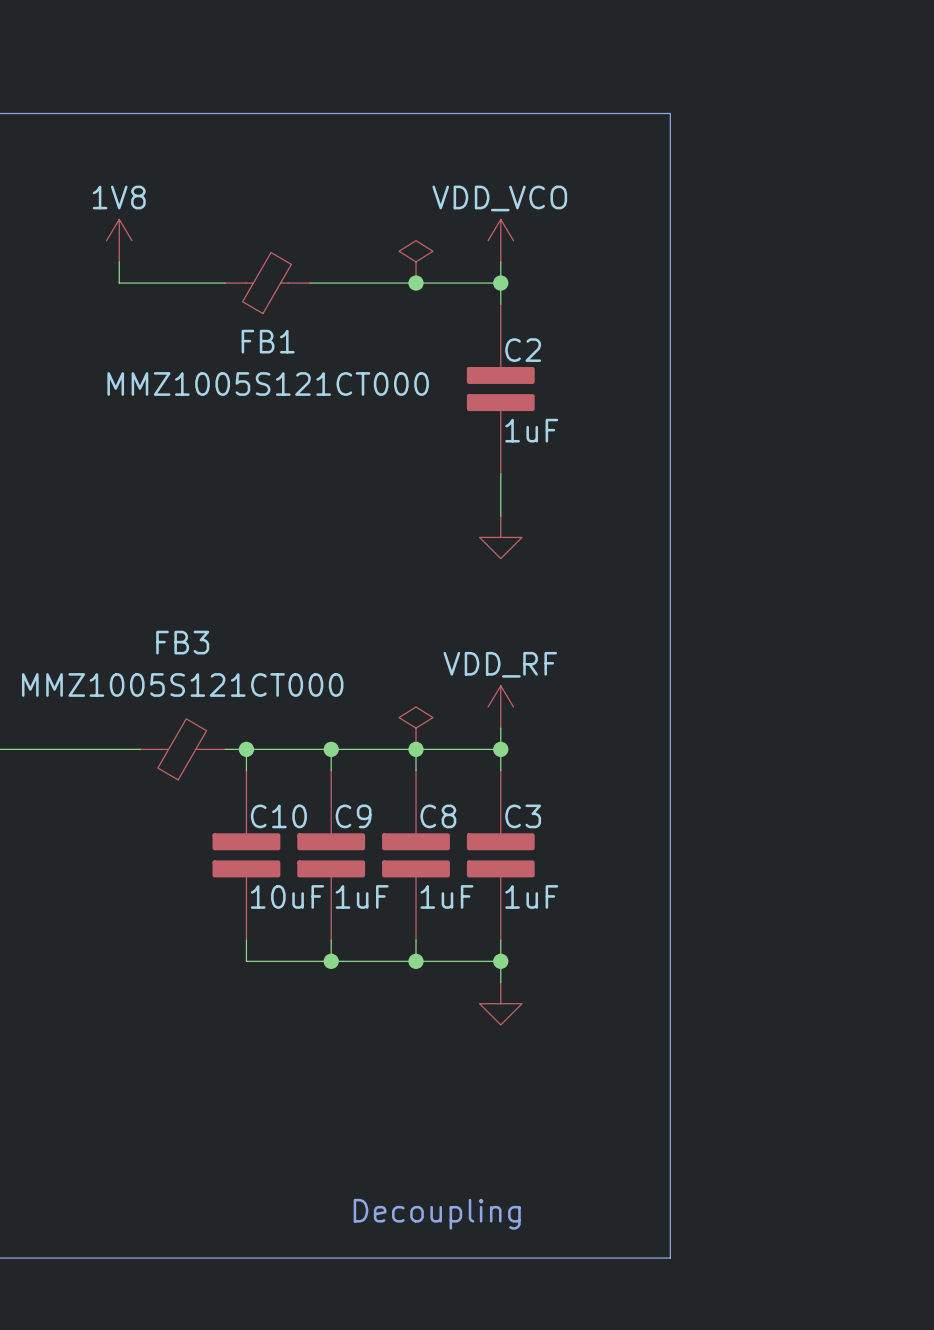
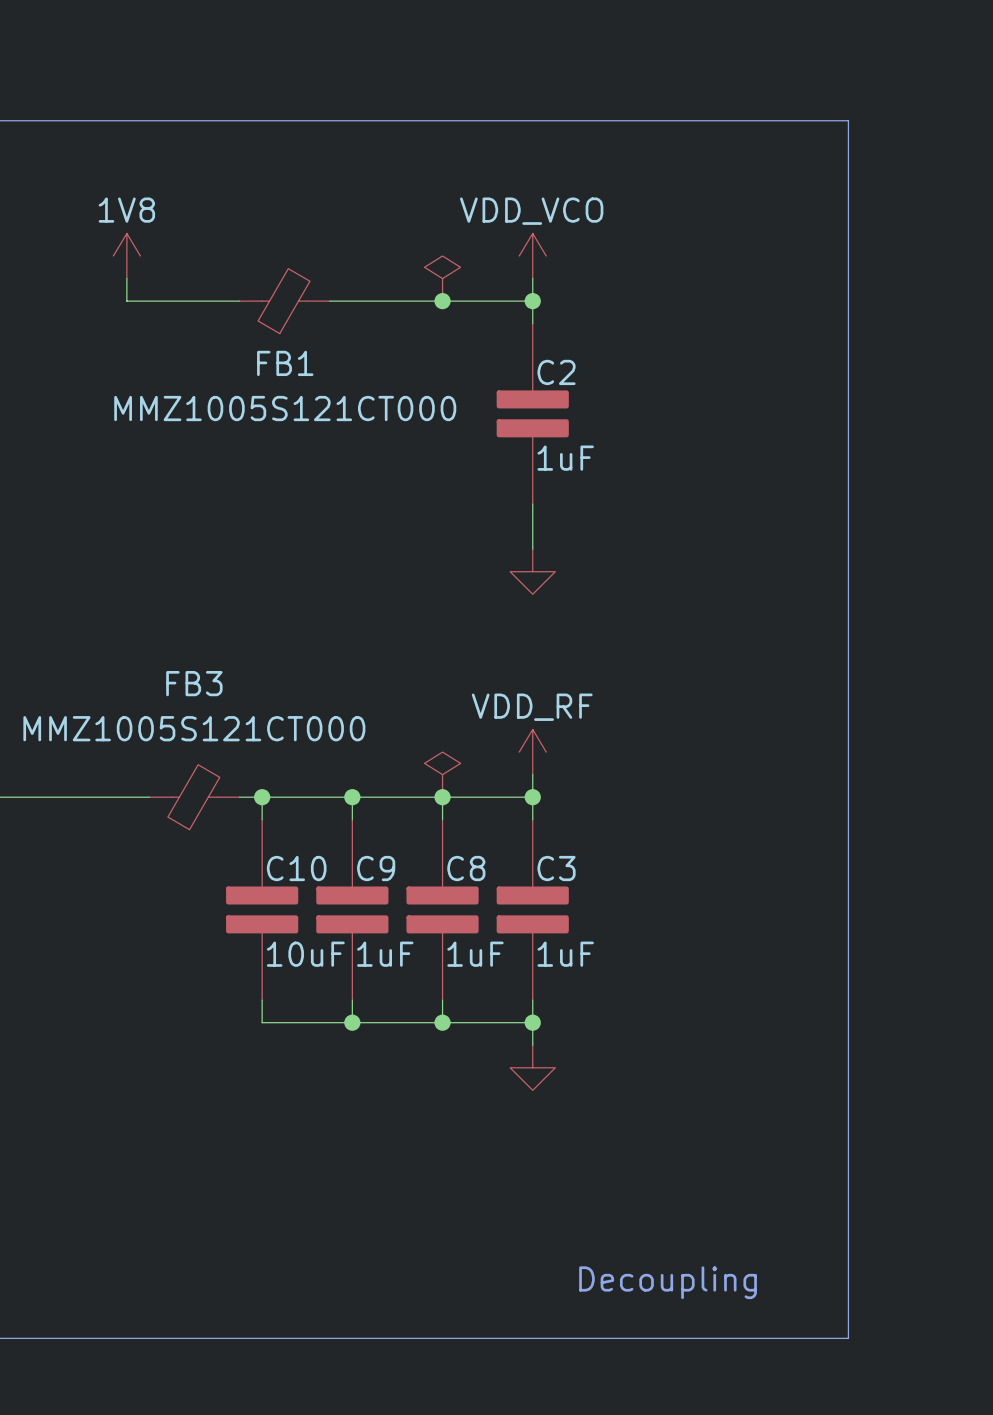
line: (670, 113) (670, 1258) -> (713, 120) (848, 120) (848, 1338) (713, 1338)
text position: Decoupling (437, 1214) -> Decoupling (668, 1282)

